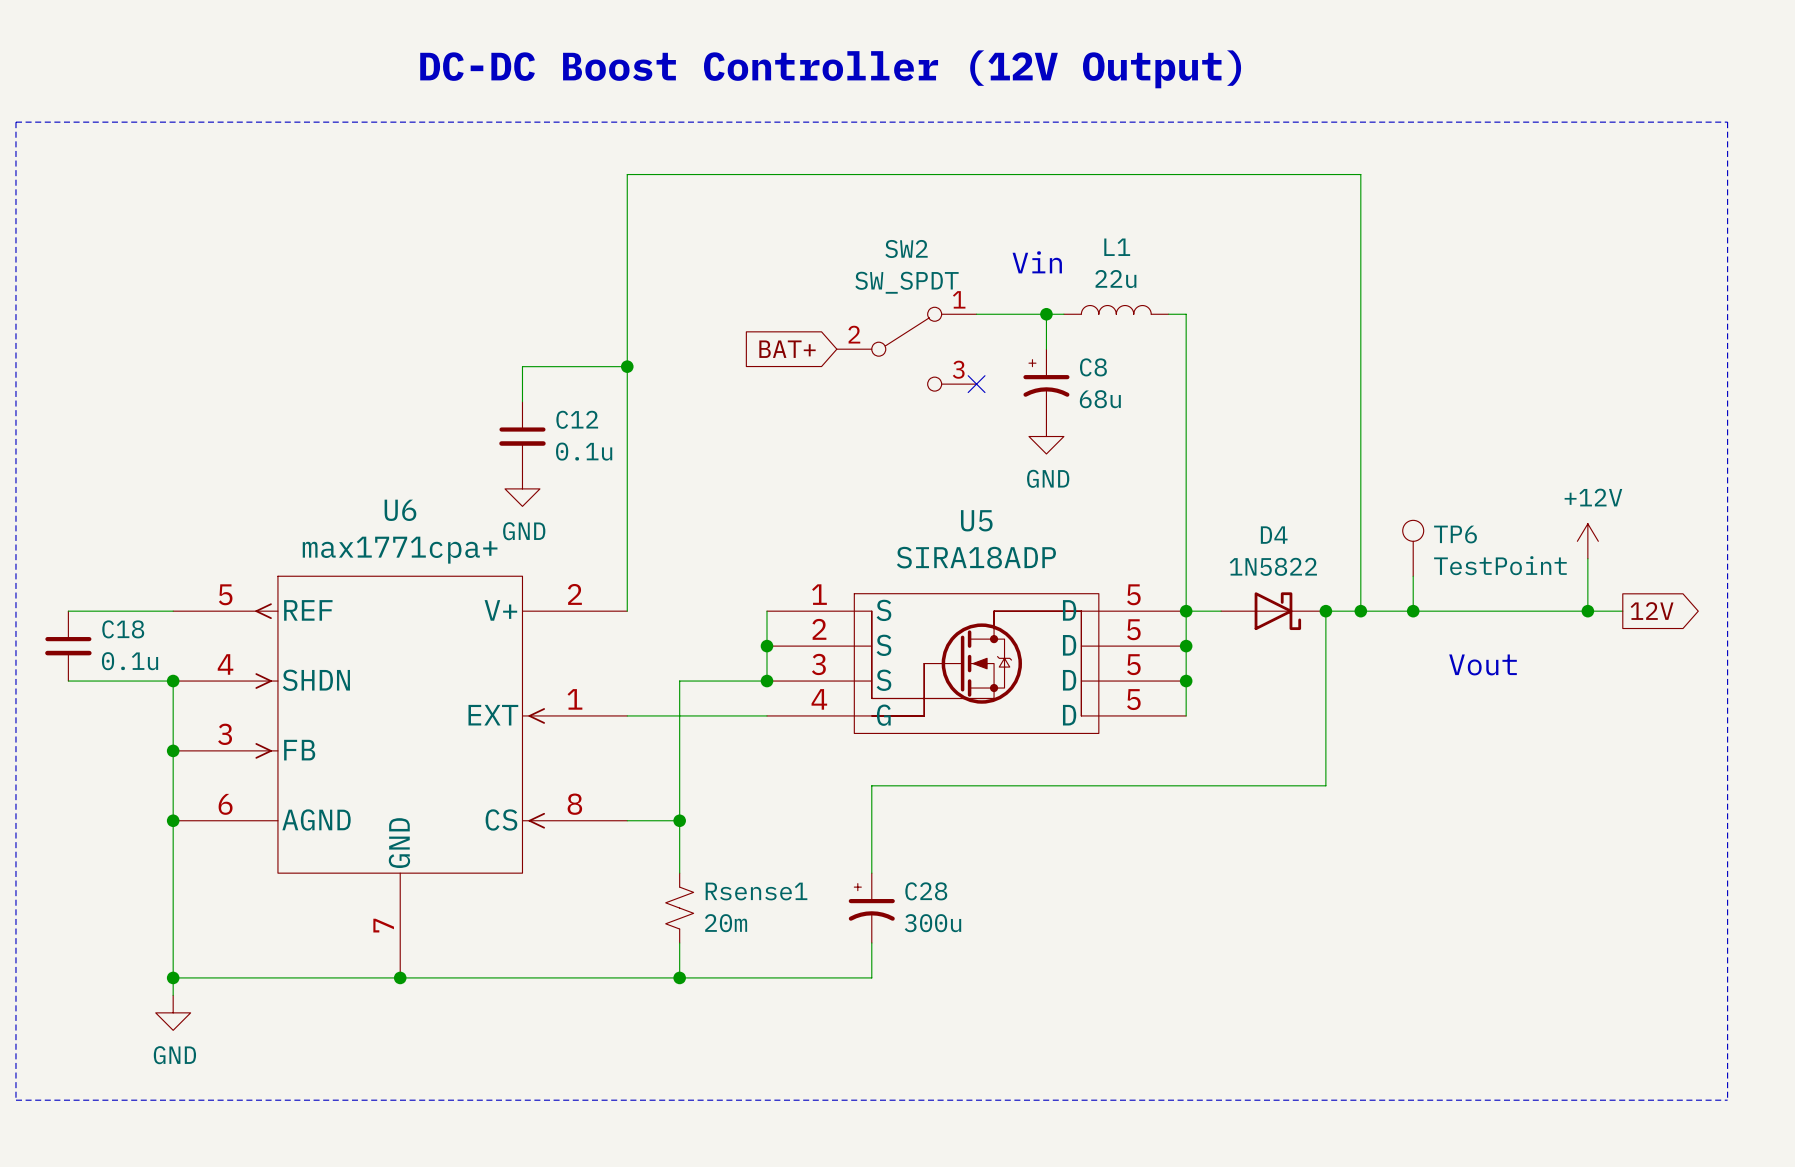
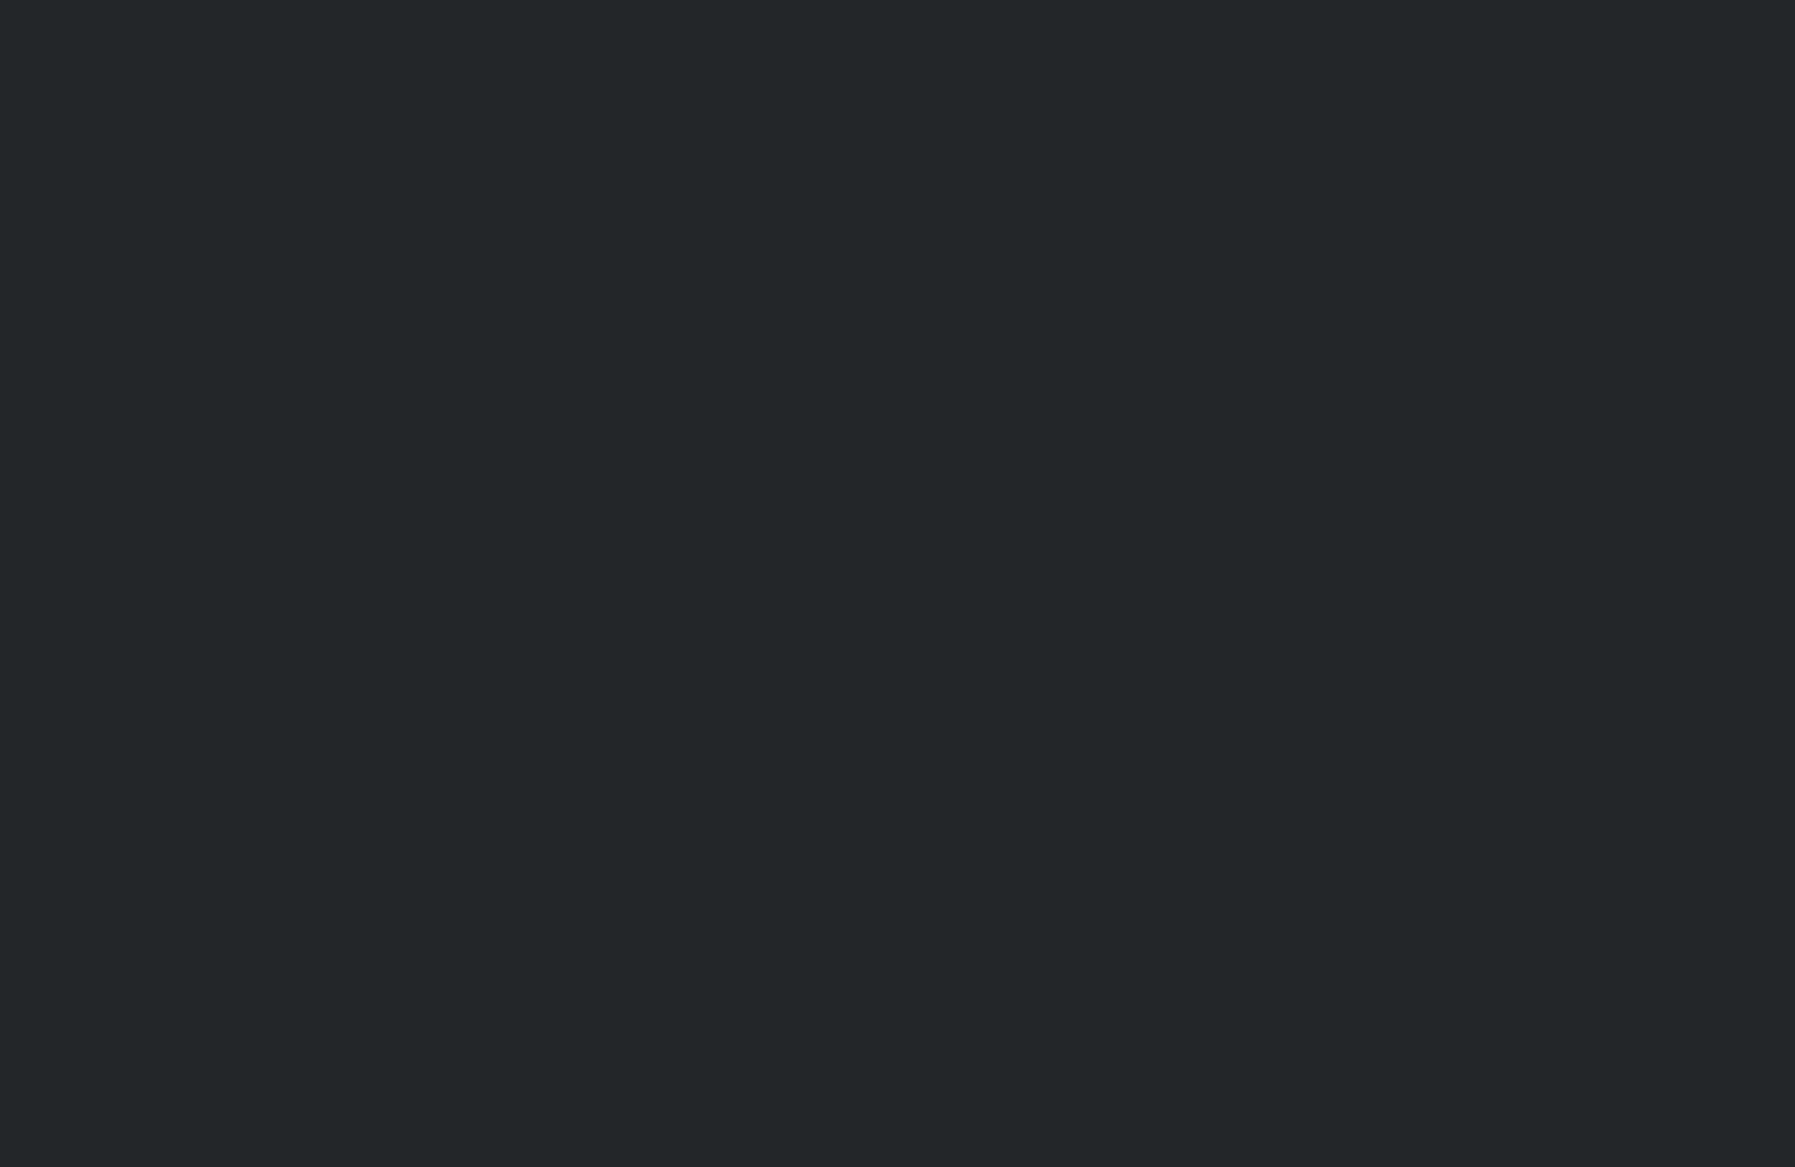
text: DC-DC Boost Controller (12V Output) (830, 69) -> none
line: (15, 122) (15, 1100) (1727, 1100) (1727, 122) (15, 122) -> none
text: Vin (1037, 262) -> none
L1: 22u (1116, 309) -> none
wire: (976, 314) (1063, 314) -> none
wire: (1046, 314) (1046, 349) -> none
junction: (1046, 314) -> none
wire: (1168, 314) (1186, 314) (1186, 715) -> none
global label: BAT+ (787, 349) -> none
SW2: SW_SPDT (906, 349) -> none
wire: (627, 366) (522, 366) (522, 401) -> none
junction: (627, 366) -> none
no-connect mark: (976, 384) -> none
C8: 68u (1046, 384) -> none
C12: 0.1u (522, 436) -> none
power symbol: GND (1046, 436) -> none
power symbol: GND (522, 488) -> none
power symbol: +12V (1587, 541) -> none
TP6: TestPoint (1413, 548) -> none
wire: (1587, 558) (1587, 611) -> none
wire: (1413, 576) (1413, 611) -> none
wire: (68, 611) (173, 611) -> none
wire: (627, 611) (627, 174) (1360, 174) (1360, 611) -> none
wire: (766, 611) (766, 681) (679, 681) (679, 873) -> none
wire: (1186, 611) (1221, 611) -> none
junction: (1186, 611) -> none
D4: 1N5822 (1273, 611) -> none
junction: (1325, 611) -> none
junction: (1360, 611) -> none
junction: (1413, 611) -> none
junction: (1587, 611) -> none
wire: (1622, 611) (1325, 611) (1325, 785) (871, 785) (871, 873) -> none
global label: 12V (1652, 611) -> none
C18: 0.1u (68, 646) -> none
junction: (766, 646) -> none
junction: (1186, 646) -> none
U5: SIRA18ADP (976, 663) -> none
text: Vout (1483, 664) -> none
wire: (68, 681) (173, 681) (173, 995) -> none
junction: (173, 681) -> none
junction: (766, 681) -> none
junction: (1186, 681) -> none
wire: (627, 715) (766, 715) -> none
junction: (173, 750) -> none
U6: max1771cpa+ (400, 777) -> none
junction: (173, 820) -> none
wire: (627, 820) (679, 820) -> none
junction: (679, 820) -> none
Rsense1: 20m (679, 908) -> none
C28: 300u (871, 908) -> none
wire: (679, 943) (679, 977) -> none
wire: (871, 943) (871, 977) (173, 977) -> none
junction: (173, 977) -> none
junction: (400, 977) -> none
junction: (679, 977) -> none
power symbol: GND (173, 1012) -> none

